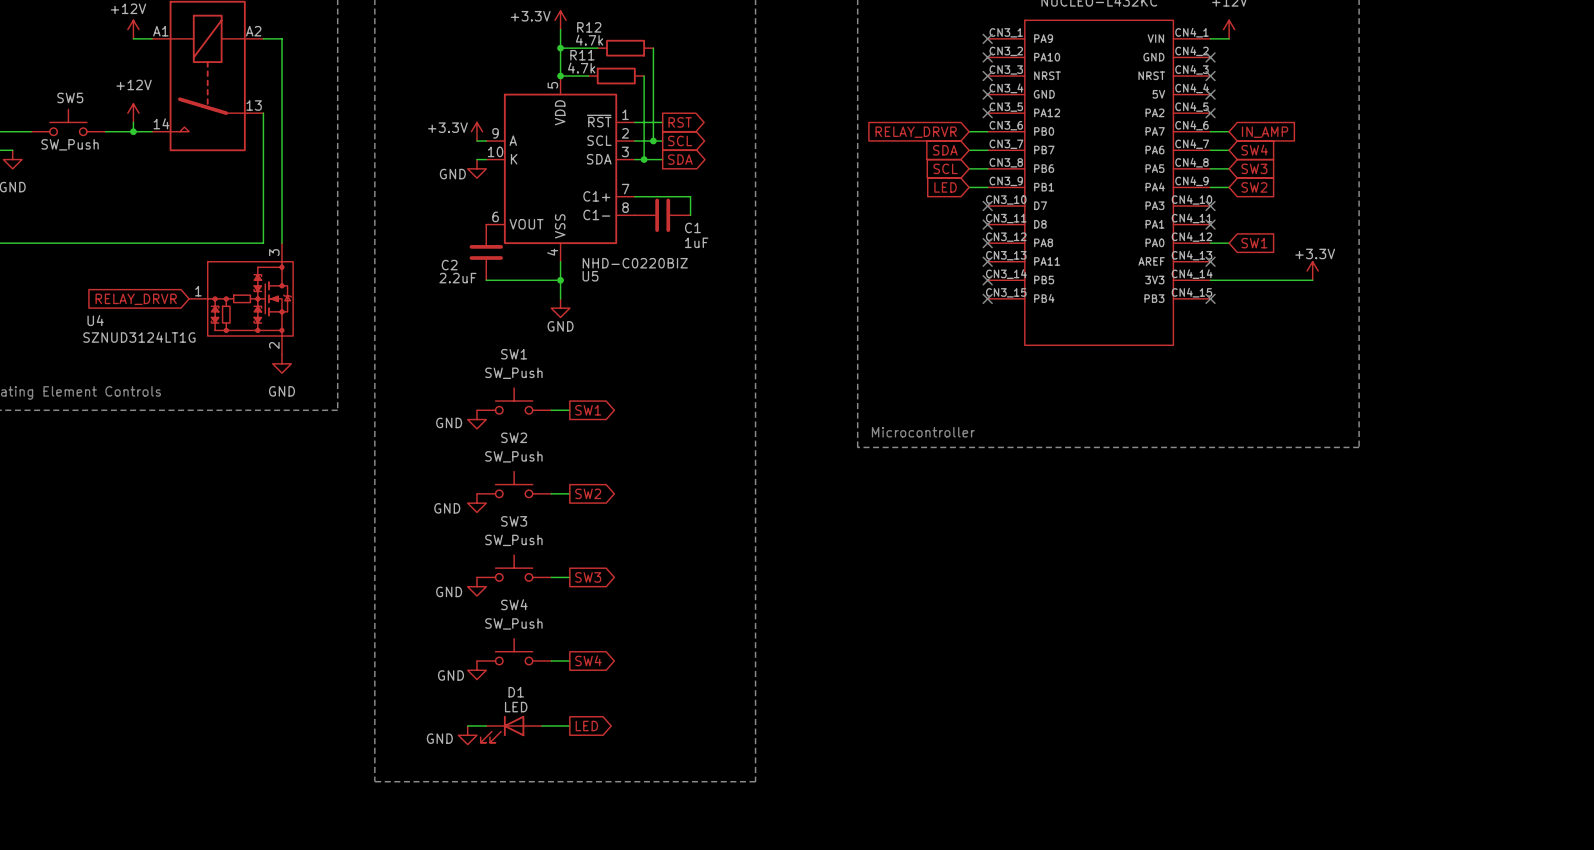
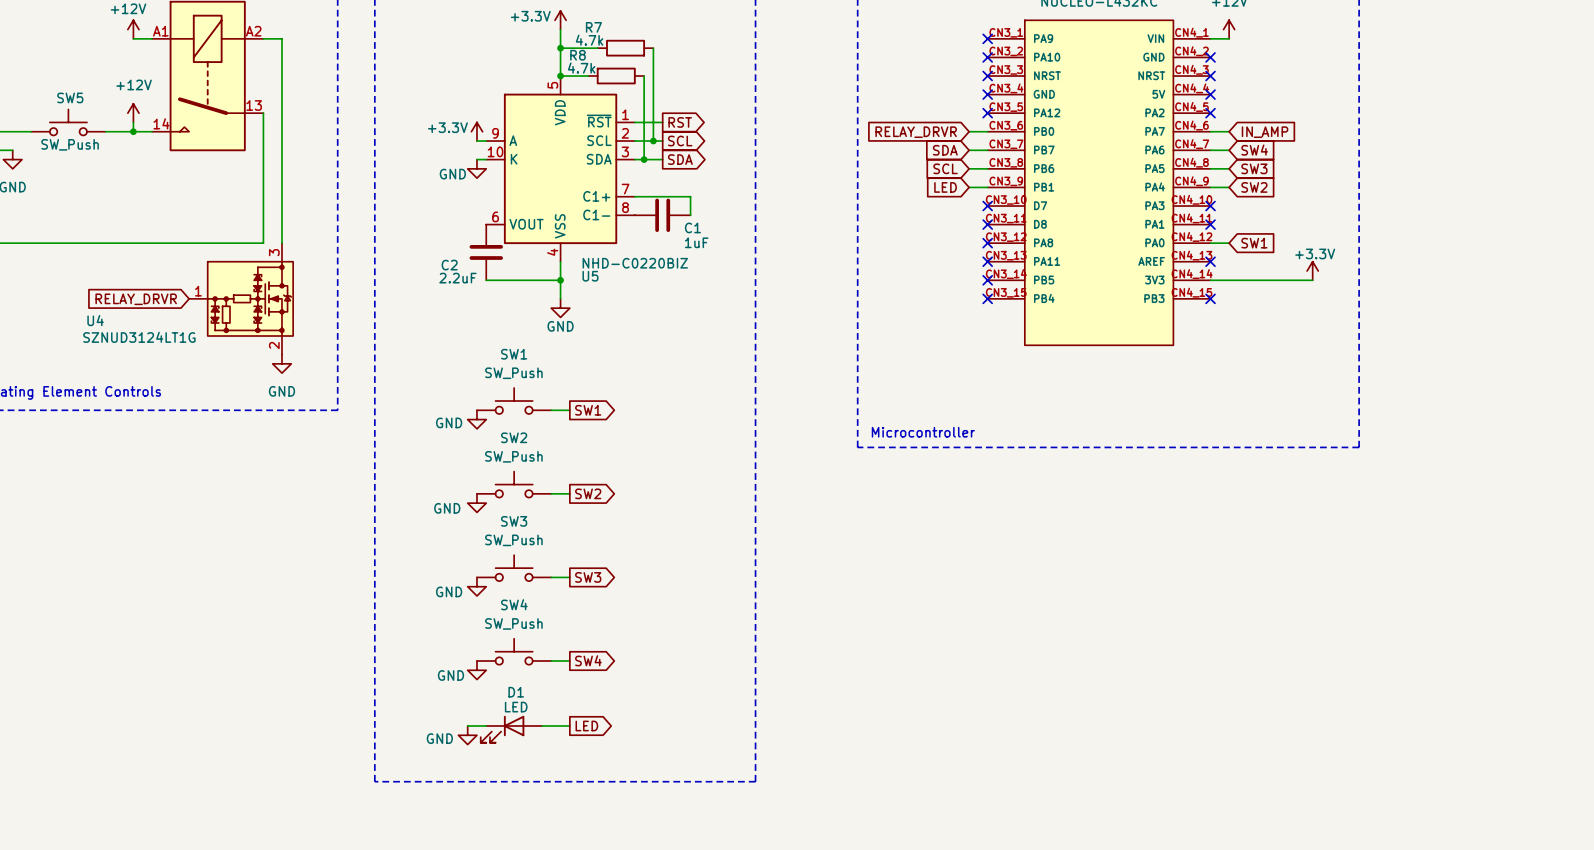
R12 name: R12 (589, 27) -> R7 (593, 27)
R11 name: R11 (582, 55) -> R8 (578, 55)

